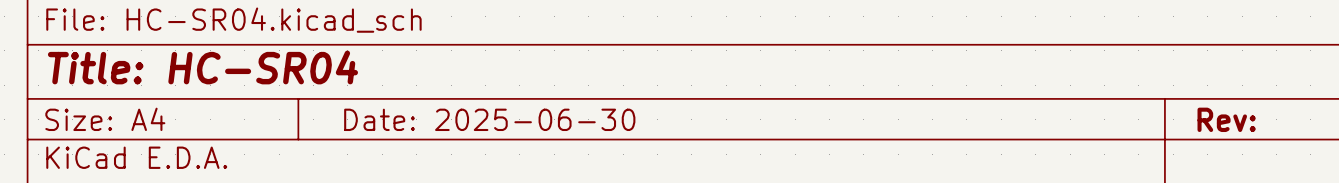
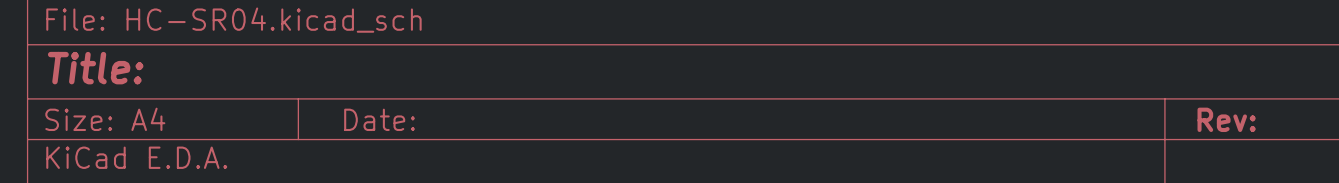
title block: Title: HC-SR04 (202, 67) -> Title: (95, 68)
title block: Date: 2025-06-30 (489, 119) -> Date: (379, 119)

